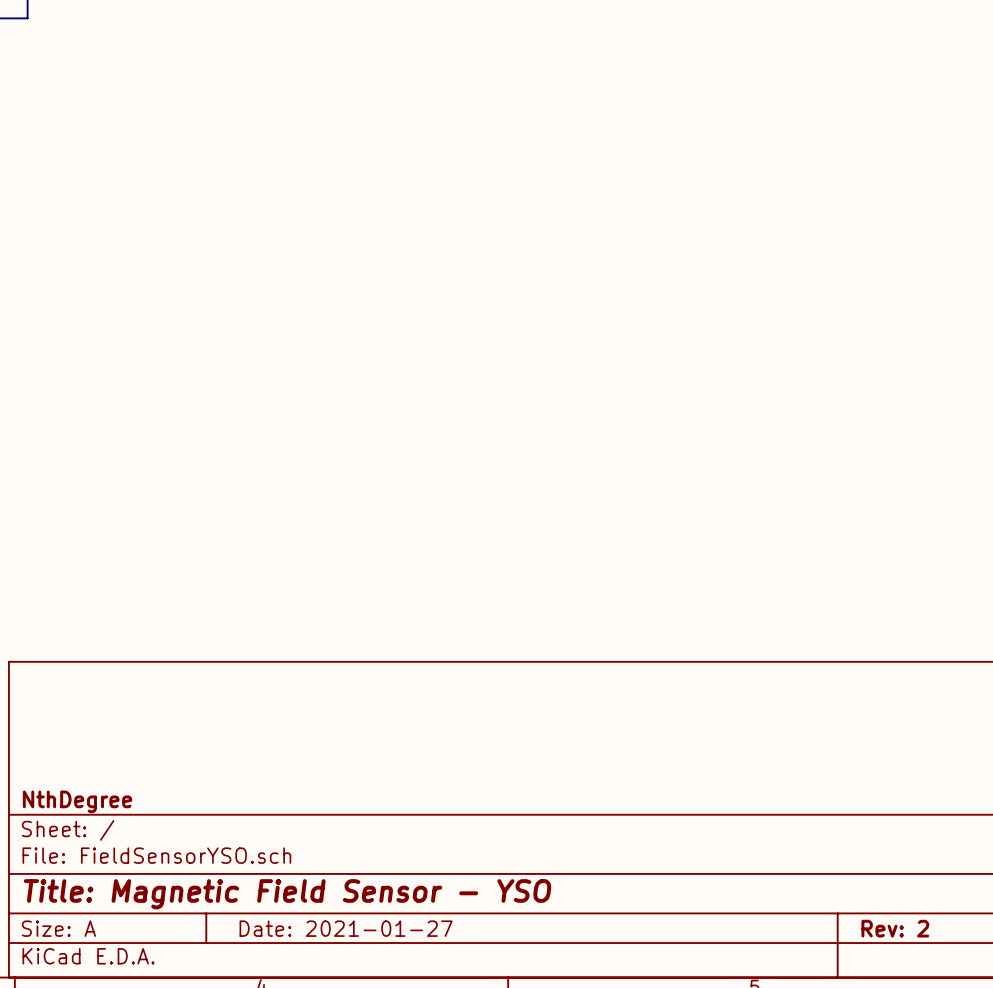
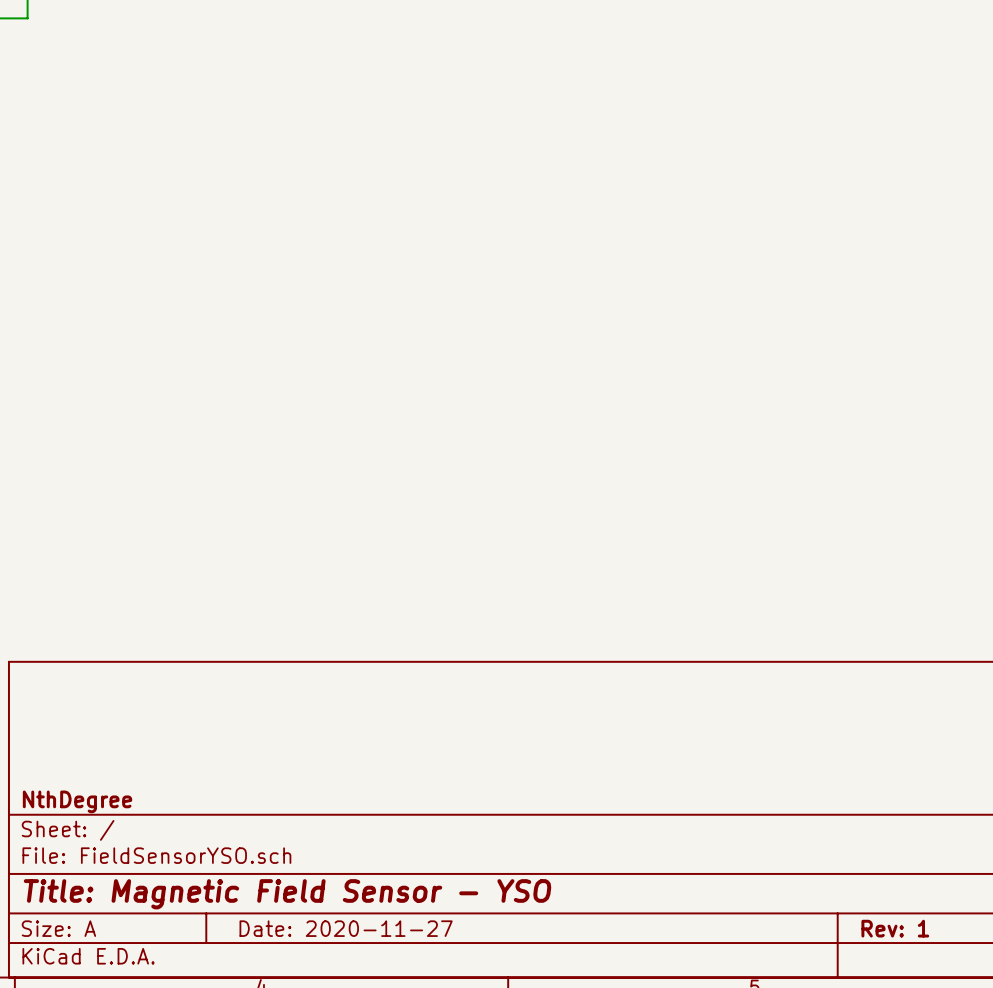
title block: Date: 2021-01-27 (346, 928) -> Date: 2020-11-27 (346, 928)
title block: Rev: 2 (895, 928) -> Rev: 1 (895, 928)

